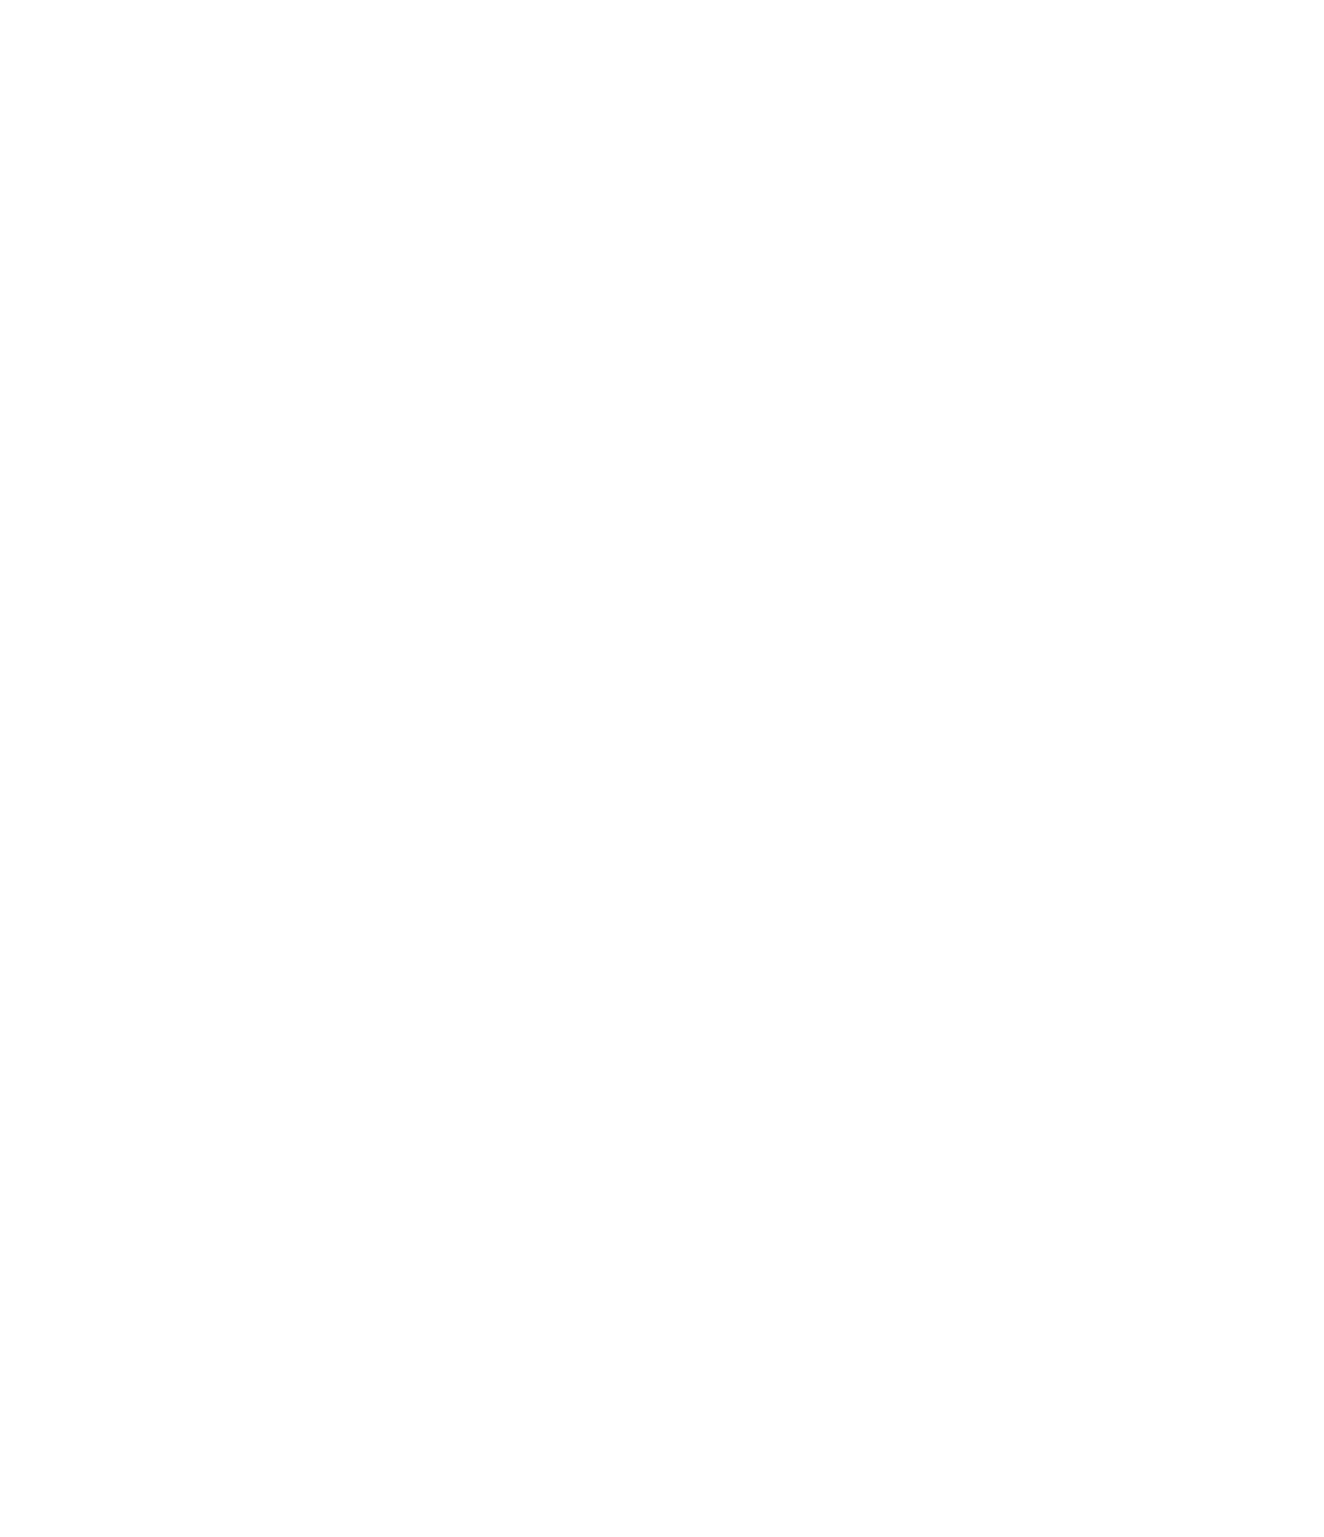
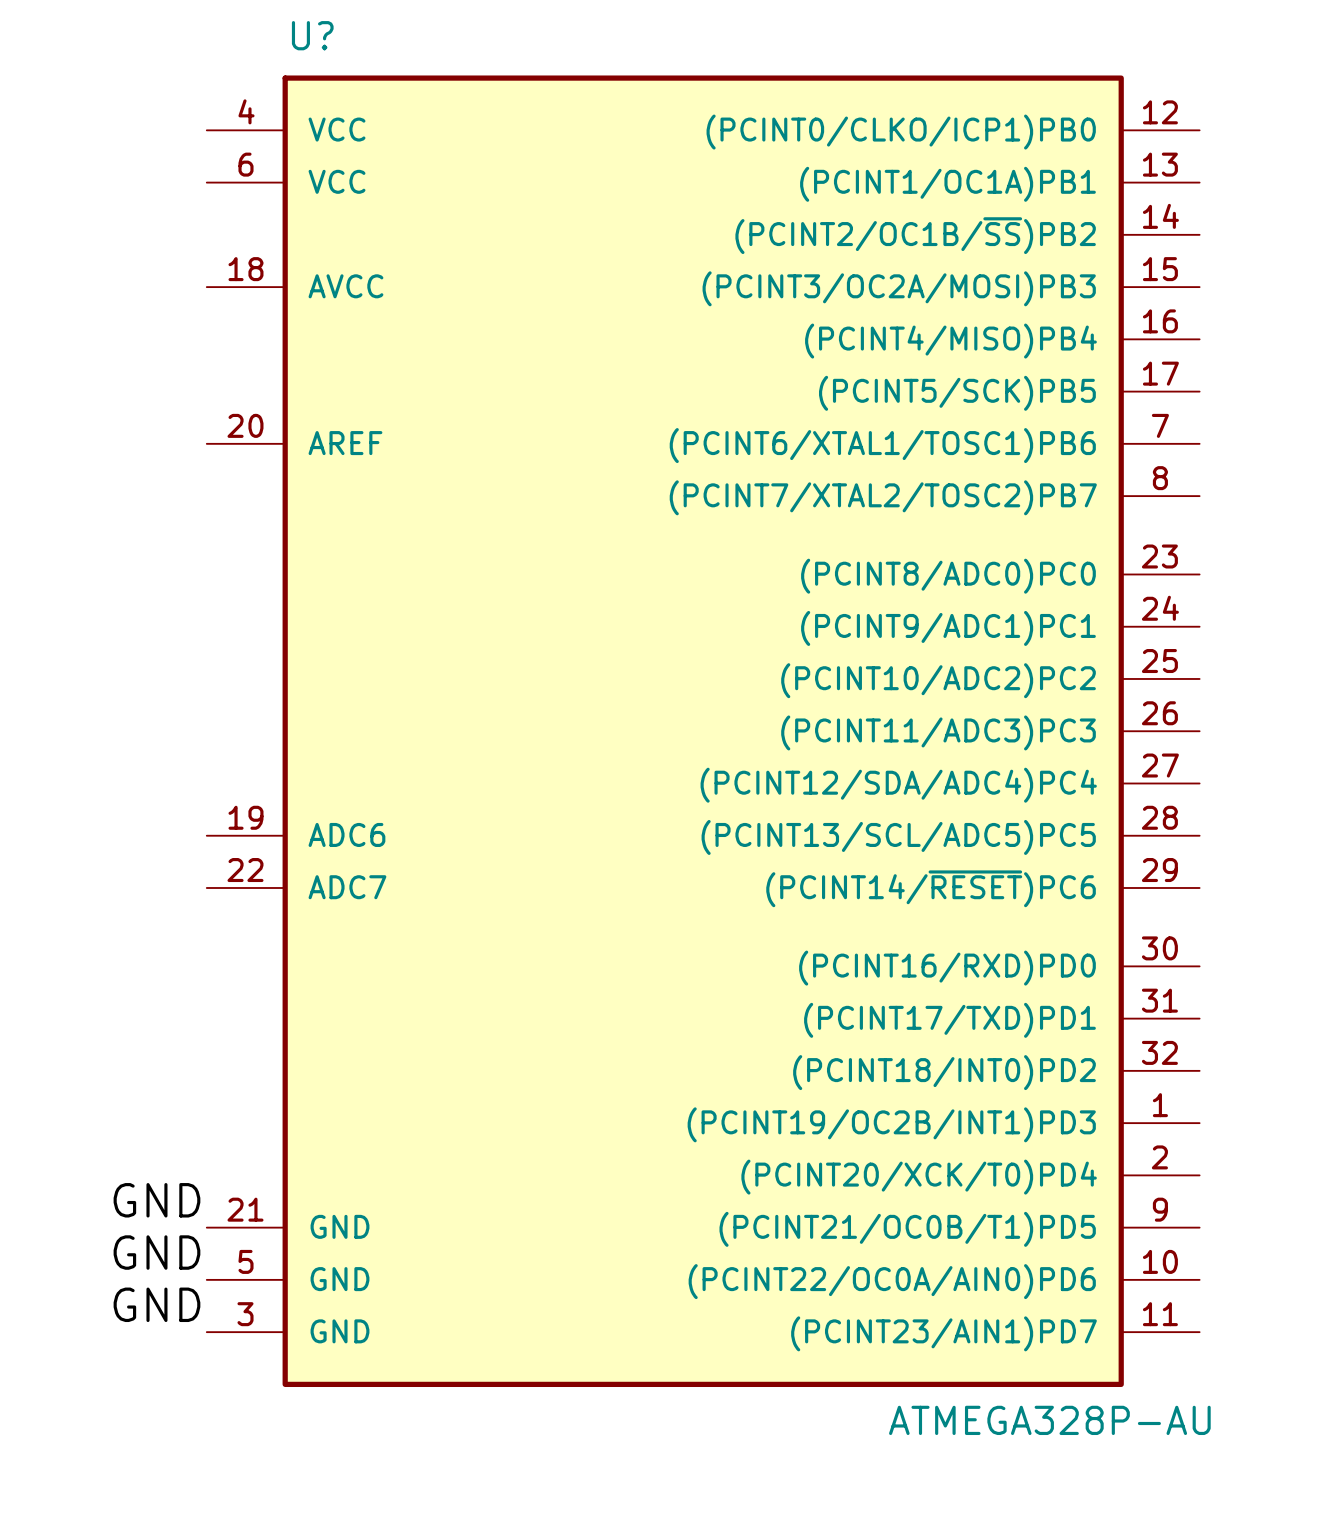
U?: none -> ATMEGA328P-AU (703, 731)
label: none -> GND (156, 1200)
label: none -> GND (156, 1252)
label: none -> GND (156, 1304)

